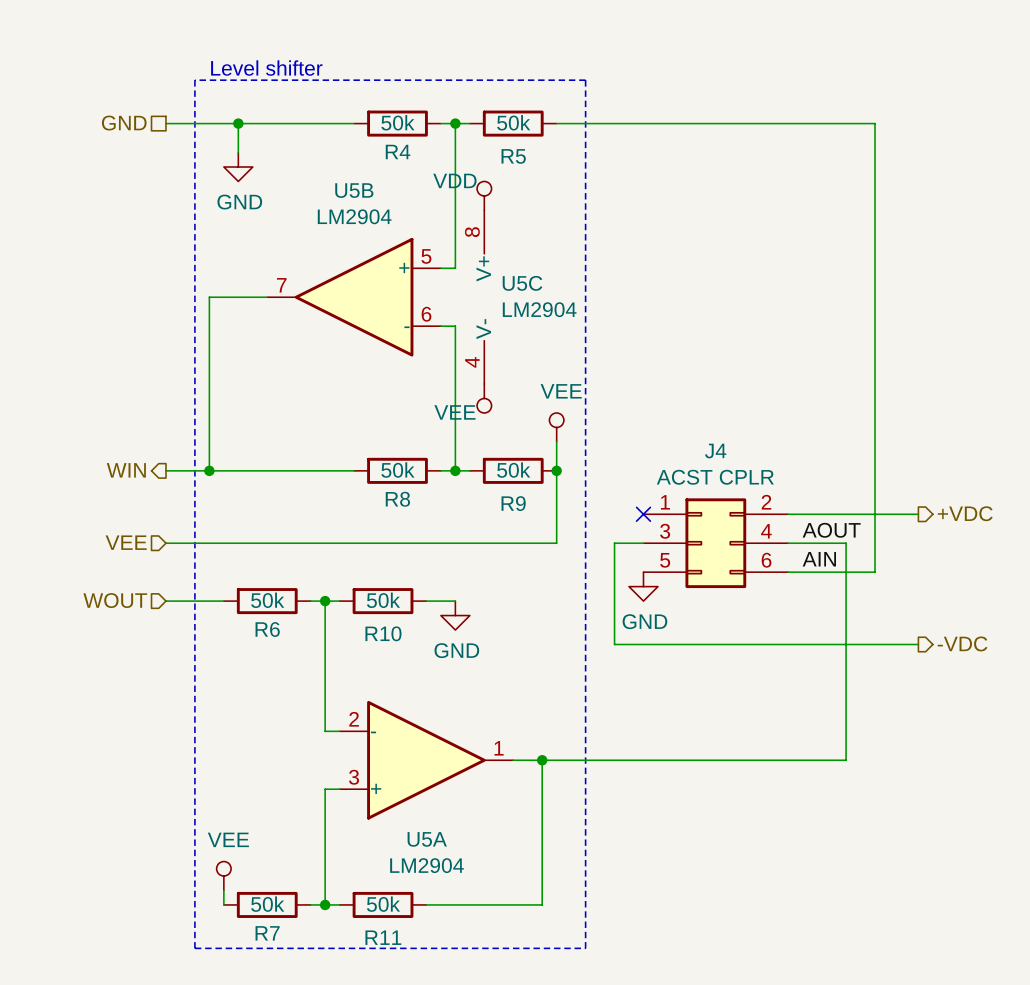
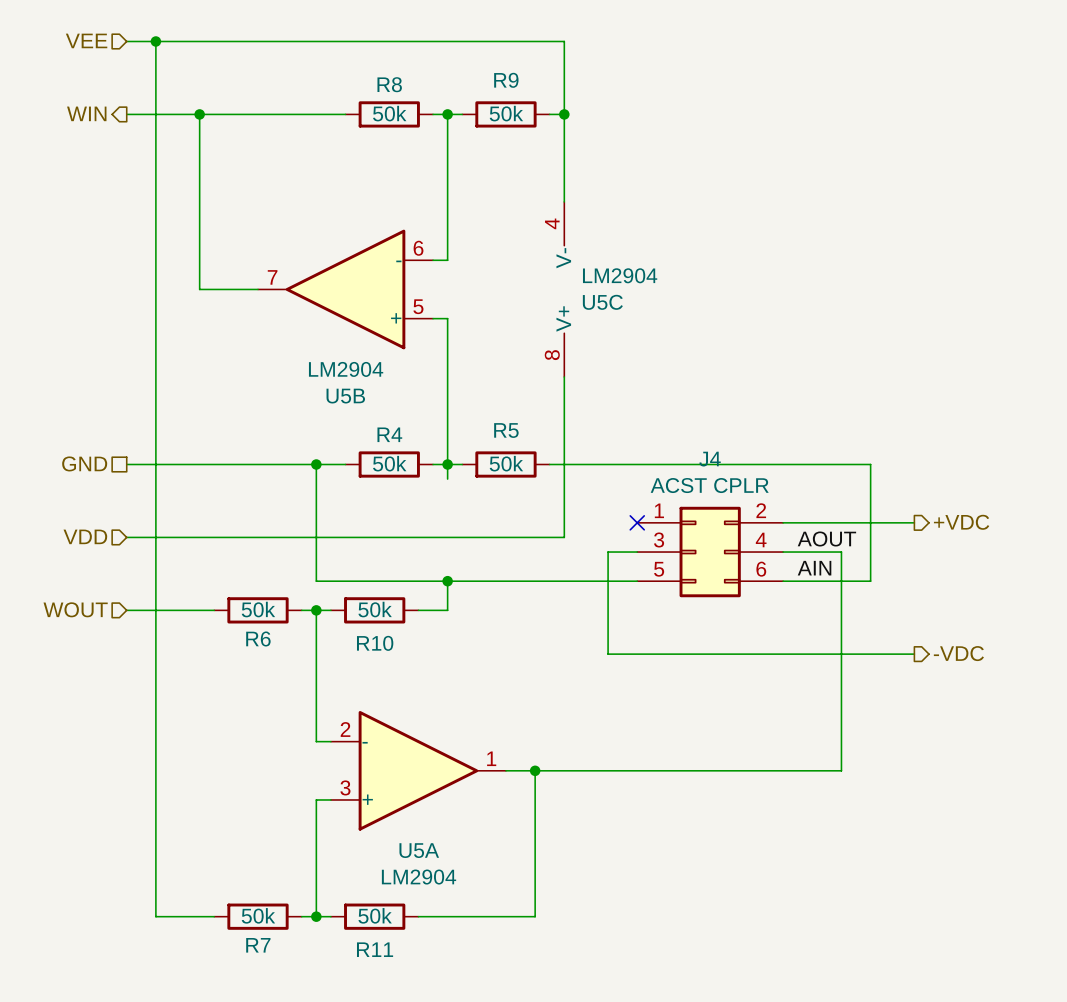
hierarchical label: none -> VEE (86, 40)
wire: none -> (126, 41) (564, 41) (564, 201)
junction: none -> (155, 41)
text: Level shifter (266, 68) -> none
line: (194, 80) (585, 80) (585, 948) (194, 948) (194, 80) -> none
hierarchical label: none -> WIN (86, 113)
wire: none -> (126, 114) (345, 114)
wire: none -> (199, 114) (199, 289) (258, 289)
wire: none -> (447, 114) (447, 129)
wire: none -> (549, 114) (564, 114)
junction: none -> (564, 114)
hierarchical label: GND (124, 123) -> none
wire: (165, 123) (354, 123) -> none
wire: (238, 123) (238, 152) -> none
junction position: (238, 123) -> (199, 114)
R4 position: (397, 123) -> (389, 464)
wire: (440, 123) (469, 123) -> (433, 114) (462, 114)
junction position: (455, 123) -> (447, 114)
R5 position: (513, 123) -> (505, 464)
wire: (556, 123) (875, 123) (875, 456) -> (549, 464) (870, 464)
R4 name position: R4 (398, 151) -> R4 (389, 434)
R5 name position: R5 (513, 156) -> R5 (506, 430)
power symbol: GND (238, 167) -> none
power symbol: VDD (484, 195) -> none
wire: (455, 253) (455, 268) (440, 268) -> (447, 260) (433, 260)
U5C name position: U5C (522, 283) -> U5C (602, 302)
wire: (267, 297) (209, 297) (209, 470) -> none
U5B flip: as is (354, 297) -> up-down (345, 289)
U5C rotation: 0° (484, 297) -> 180° (564, 289)
U5C value position: LM2904 (539, 309) -> LM2904 (620, 275)
wire: (440, 326) (455, 326) -> (433, 318) (447, 318) (447, 333)
wire: none -> (564, 376) (564, 537) (126, 537)
power symbol: VEE (484, 398) -> none
power symbol: VEE (556, 427) -> none
wire: (556, 441) (556, 543) (165, 543) -> none
hierarchical label: none -> GND (84, 463)
wire: none -> (126, 464) (345, 464)
wire: none -> (316, 464) (316, 581) (637, 581)
junction: none -> (316, 464)
hierarchical label: WIN (126, 470) -> none
wire: (165, 470) (354, 470) -> none
junction: (209, 470) -> none
R8 position: (397, 470) -> (389, 114)
wire: (440, 470) (469, 470) -> (433, 464) (462, 464)
junction position: (455, 470) -> (447, 464)
R9 position: (513, 470) -> (505, 114)
junction: (556, 470) -> none
R8 name position: R8 (397, 499) -> R8 (389, 84)
R9 name position: R9 (513, 503) -> R9 (506, 80)
hierarchical label: none -> VDD (85, 536)
hierarchical label: VEE (126, 542) -> none
wire: none -> (447, 581) (447, 610)
junction: none -> (447, 581)
power symbol: GND (643, 586) -> none
hierarchical label position: WOUT (115, 600) -> WOUT (75, 609)
wire: none -> (126, 610) (155, 610)
power symbol: GND (455, 615) -> none
power symbol: VEE (223, 876) -> none
wire: (223, 890) (223, 904) -> (155, 41) (155, 916) (214, 916)

